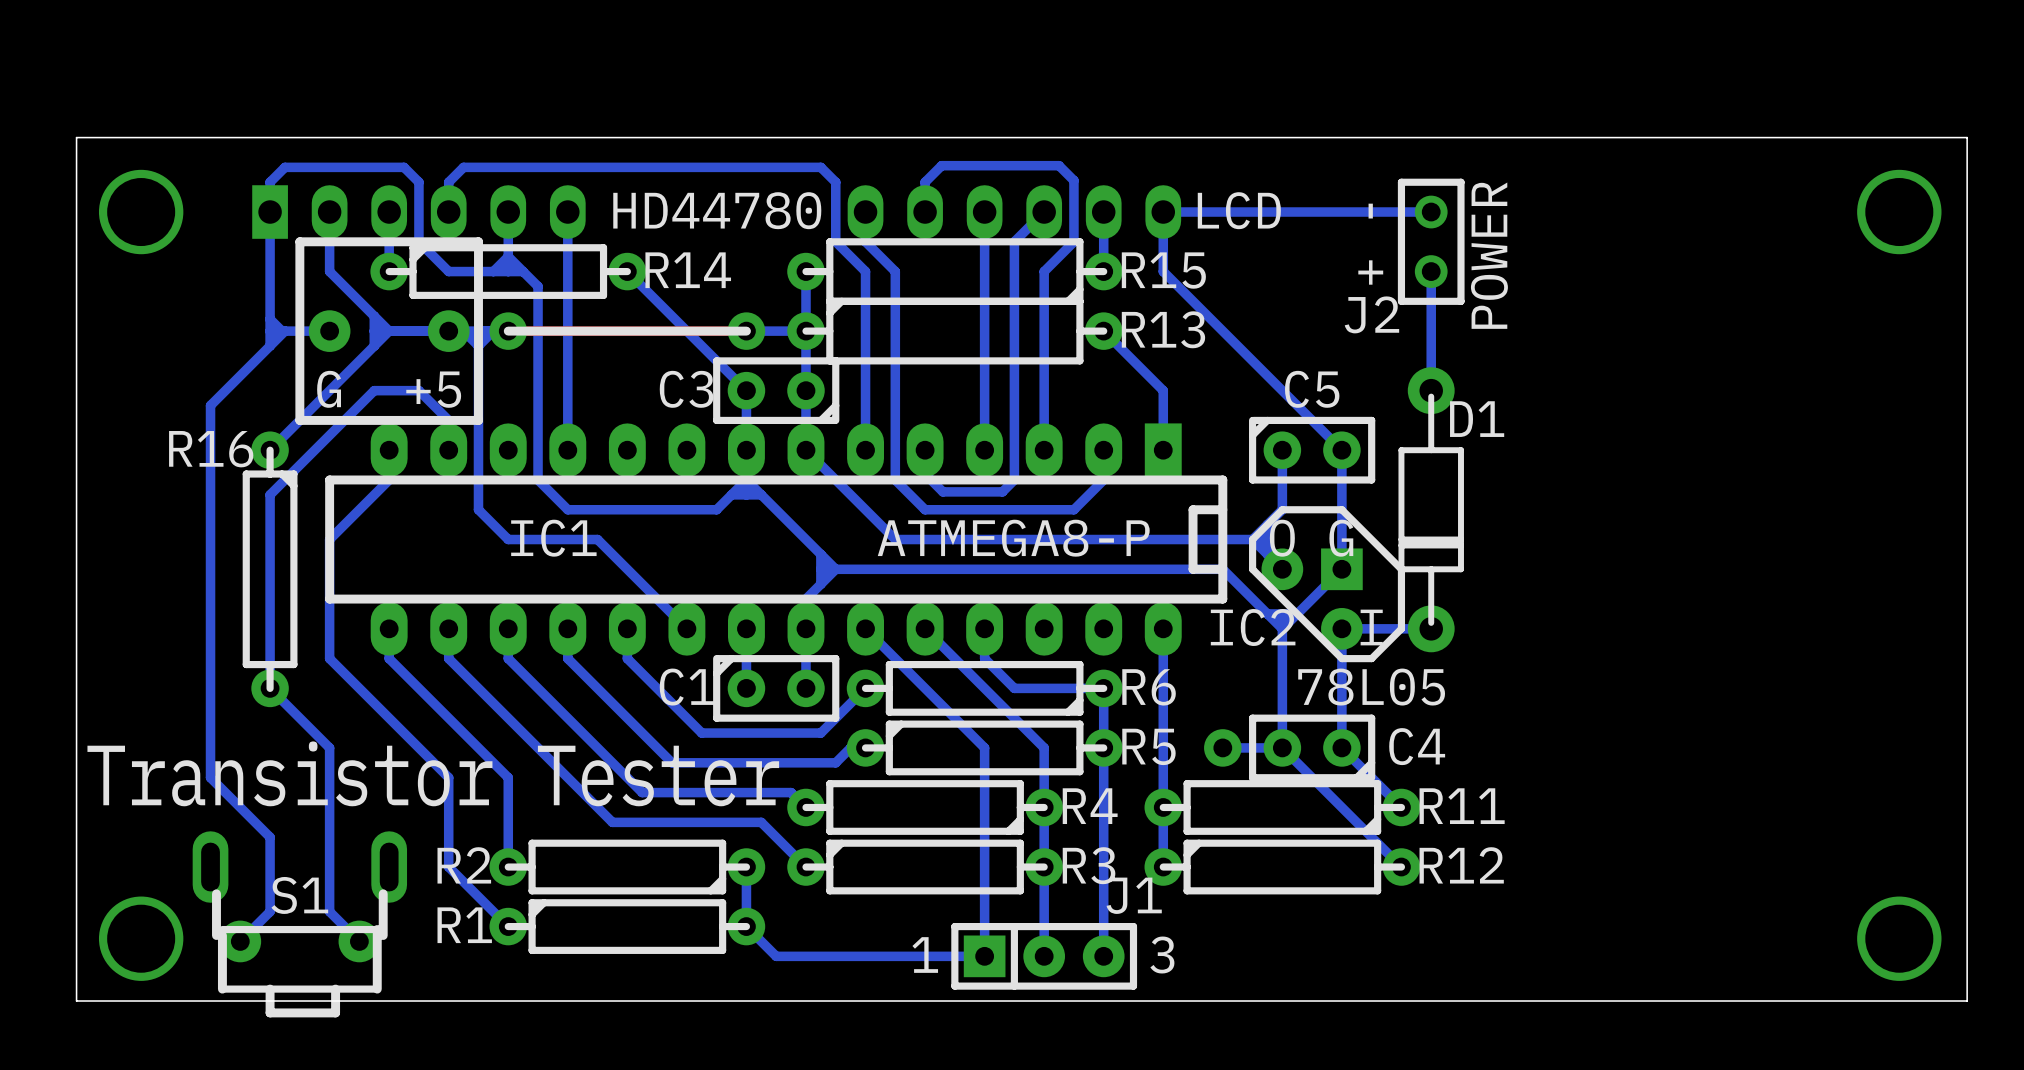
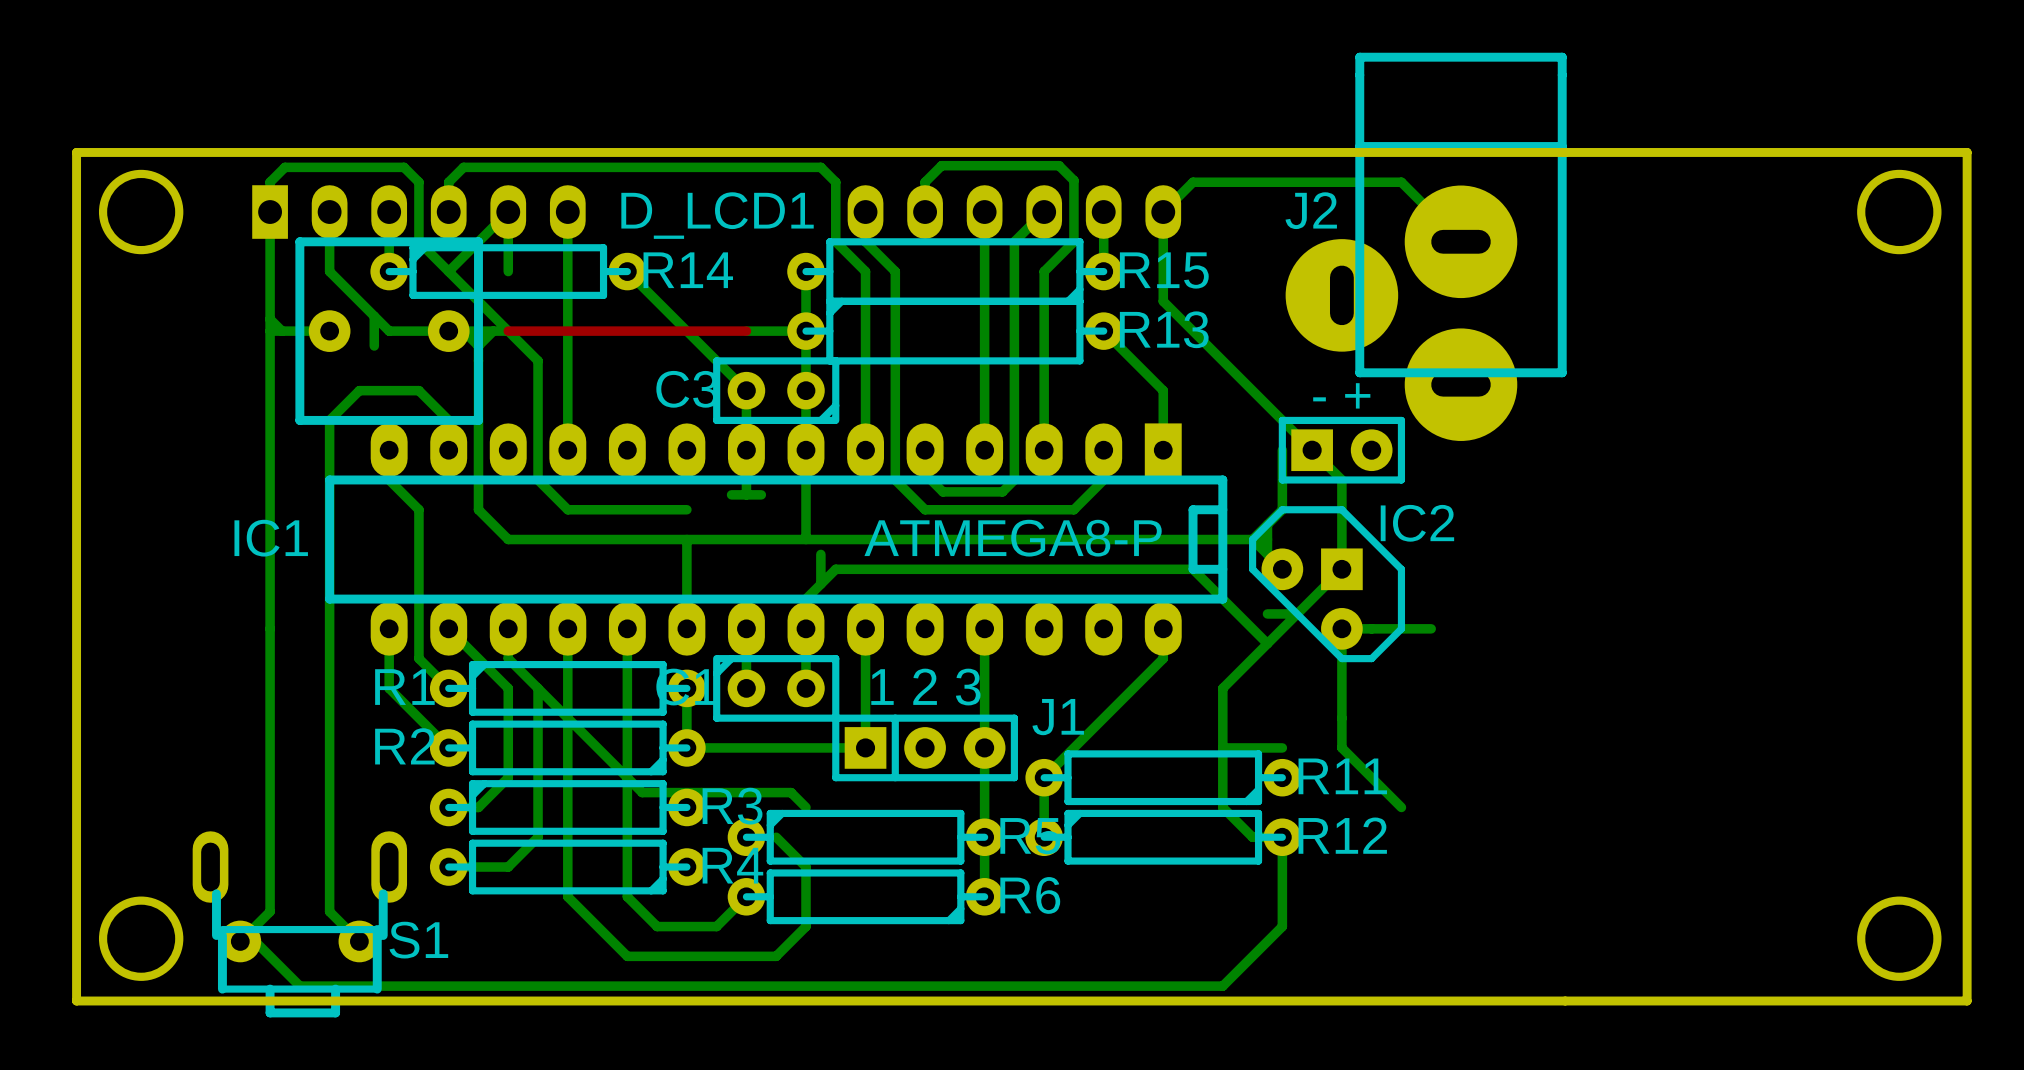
board edge: (76, 152) (76, 137) (1967, 137) (1967, 152) -> (76, 152) (1967, 152)
board edge width: thin (76, 152) (76, 1001) (1967, 1001) (1967, 152) -> thick (76, 152) (76, 1001) (1967, 1001) (1967, 152)
J2 footprint: [1397, 178, 1465, 305] -> [1285, 52, 1567, 441]
LCD: HD44780 (716, 212) -> none
D_LCD1: none -> (716, 212)
bottom track: (1163, 212) (1431, 212) -> (1163, 212) (1193, 182) (1401, 182) (1460, 241)
text rotation: 0° (1370, 244) -> 90° counterclockwise (1341, 395)
text position: - + (1370, 244) -> - + (1341, 395)
J2 value: POWER (1489, 255) -> none
bottom track: (448, 271) (523, 271) -> none
bottom track: (493, 271) (508, 256) (538, 286) (538, 360) -> (508, 212) (448, 271) (538, 360)
bottom track: (1163, 271) (1341, 450) (1341, 479) -> (1163, 271) (1163, 301) (1341, 479)
bottom track: (1431, 271) (1431, 390) -> none
J2 name position: J2 (1371, 314) -> J2 (1311, 210)
bottom track: (284, 331) (210, 405) (210, 777) (270, 837) -> (270, 688) (270, 837)
bottom track: (374, 331) (389, 331) (270, 450) -> none
line: (508, 331) (746, 331) -> none
part: (508, 331) -> none
part: (746, 331) -> none
bottom track: none -> (270, 346) (270, 494)
text: G (329, 389) -> none
text: +5 (433, 389) -> none
bottom track: (374, 390) (270, 494) -> (374, 390) (359, 390) (329, 420) (329, 539)
bottom track: (805, 450) (895, 539) -> (805, 450) (805, 539)
C5: (1312, 450) -> none
part: none -> (1341, 450)
bottom track: (389, 479) (329, 539) -> (389, 479) (418, 509) (418, 658) (448, 688)
bottom track: (686, 509) (716, 509) (746, 479) (835, 569) (820, 569) -> none
D1: (1431, 509) -> none
IC1 name position: IC1 (553, 538) -> IC1 (271, 538)
text: O (1282, 538) -> none
text: G (1341, 538) -> none
bottom track: (597, 539) (686, 628) -> (686, 539) (686, 628)
bottom track: none -> (597, 539) (895, 539)
R16: (270, 569) -> none
bottom track: (1193, 569) (1222, 569) (1282, 628) -> (1193, 569) (1267, 643)
bottom track: (1282, 613) (1282, 747) (1401, 867) -> none
IC2 name position: IC2 (1253, 627) -> IC2 (1417, 523)
text: I (1371, 627) -> none
bottom track: (448, 628) (448, 658) (612, 822) (761, 822) (776, 837) -> (448, 628) (508, 688) (508, 777) (478, 807) (448, 807)
bottom track: (865, 628) (984, 747) -> (865, 628) (865, 747)
bottom track: (925, 628) (1044, 747) (1044, 777) -> none
bottom track: none -> (1282, 628) (1222, 688) (1222, 807) (1252, 837) (1282, 837) (1282, 926) (1222, 986) (299, 986) (255, 941) (240, 941)
bottom track: (329, 658) (448, 777) (448, 867) (508, 926) -> none
bottom track: (389, 658) (508, 777) (508, 867) -> (389, 658) (389, 688) (448, 747)
bottom track: (567, 658) (672, 762) (835, 762) (850, 747) -> (686, 688) (686, 747) (850, 747)
bottom track: none -> (567, 658) (567, 896) (627, 956) (776, 956) (805, 926) (805, 867)
bottom track: (627, 658) (701, 733) (820, 733) (865, 688) -> (627, 658) (627, 896) (657, 926) (716, 926) (746, 896)
bottom track: (984, 658) (1014, 688) (1103, 688) (1103, 956) -> (984, 658) (984, 747)
bottom track: (1163, 658) (1163, 867) -> (1163, 658) (1044, 777)
text: none -> 1 2 3 (925, 687)
IC2 value: 78L05 (1371, 687) -> none
bottom track: (270, 688) (329, 747) -> (329, 658) (329, 747)
bottom track: none -> (538, 688) (538, 837) (508, 867) (448, 867)
R6 position: (984, 688) -> (865, 896)
R5 position: (984, 747) -> (865, 837)
part: (1222, 747) -> none
C4: (1312, 747) -> none
text: Transistor Tester (433, 773) -> none
R4 position: (925, 807) -> (567, 867)
R11 position: (1282, 807) -> (1163, 777)
bottom track: (1044, 837) (1044, 956) -> none
R2 position: (627, 867) -> (567, 747)
bottom track: (746, 867) (746, 926) (776, 956) (984, 956) (984, 896) -> none
R3 position: (925, 867) -> (567, 807)
R12 position: (1282, 867) -> (1163, 837)
S1 name position: S1 (299, 895) -> S1 (418, 940)
J1 name position: J1 (1134, 895) -> J1 (1058, 717)
J1 footprint: [951, 923, 1138, 990] -> [832, 714, 1018, 782]
R1 position: (627, 926) -> (567, 688)
text: 1 (925, 955) -> none
text: 3 (1162, 955) -> none

